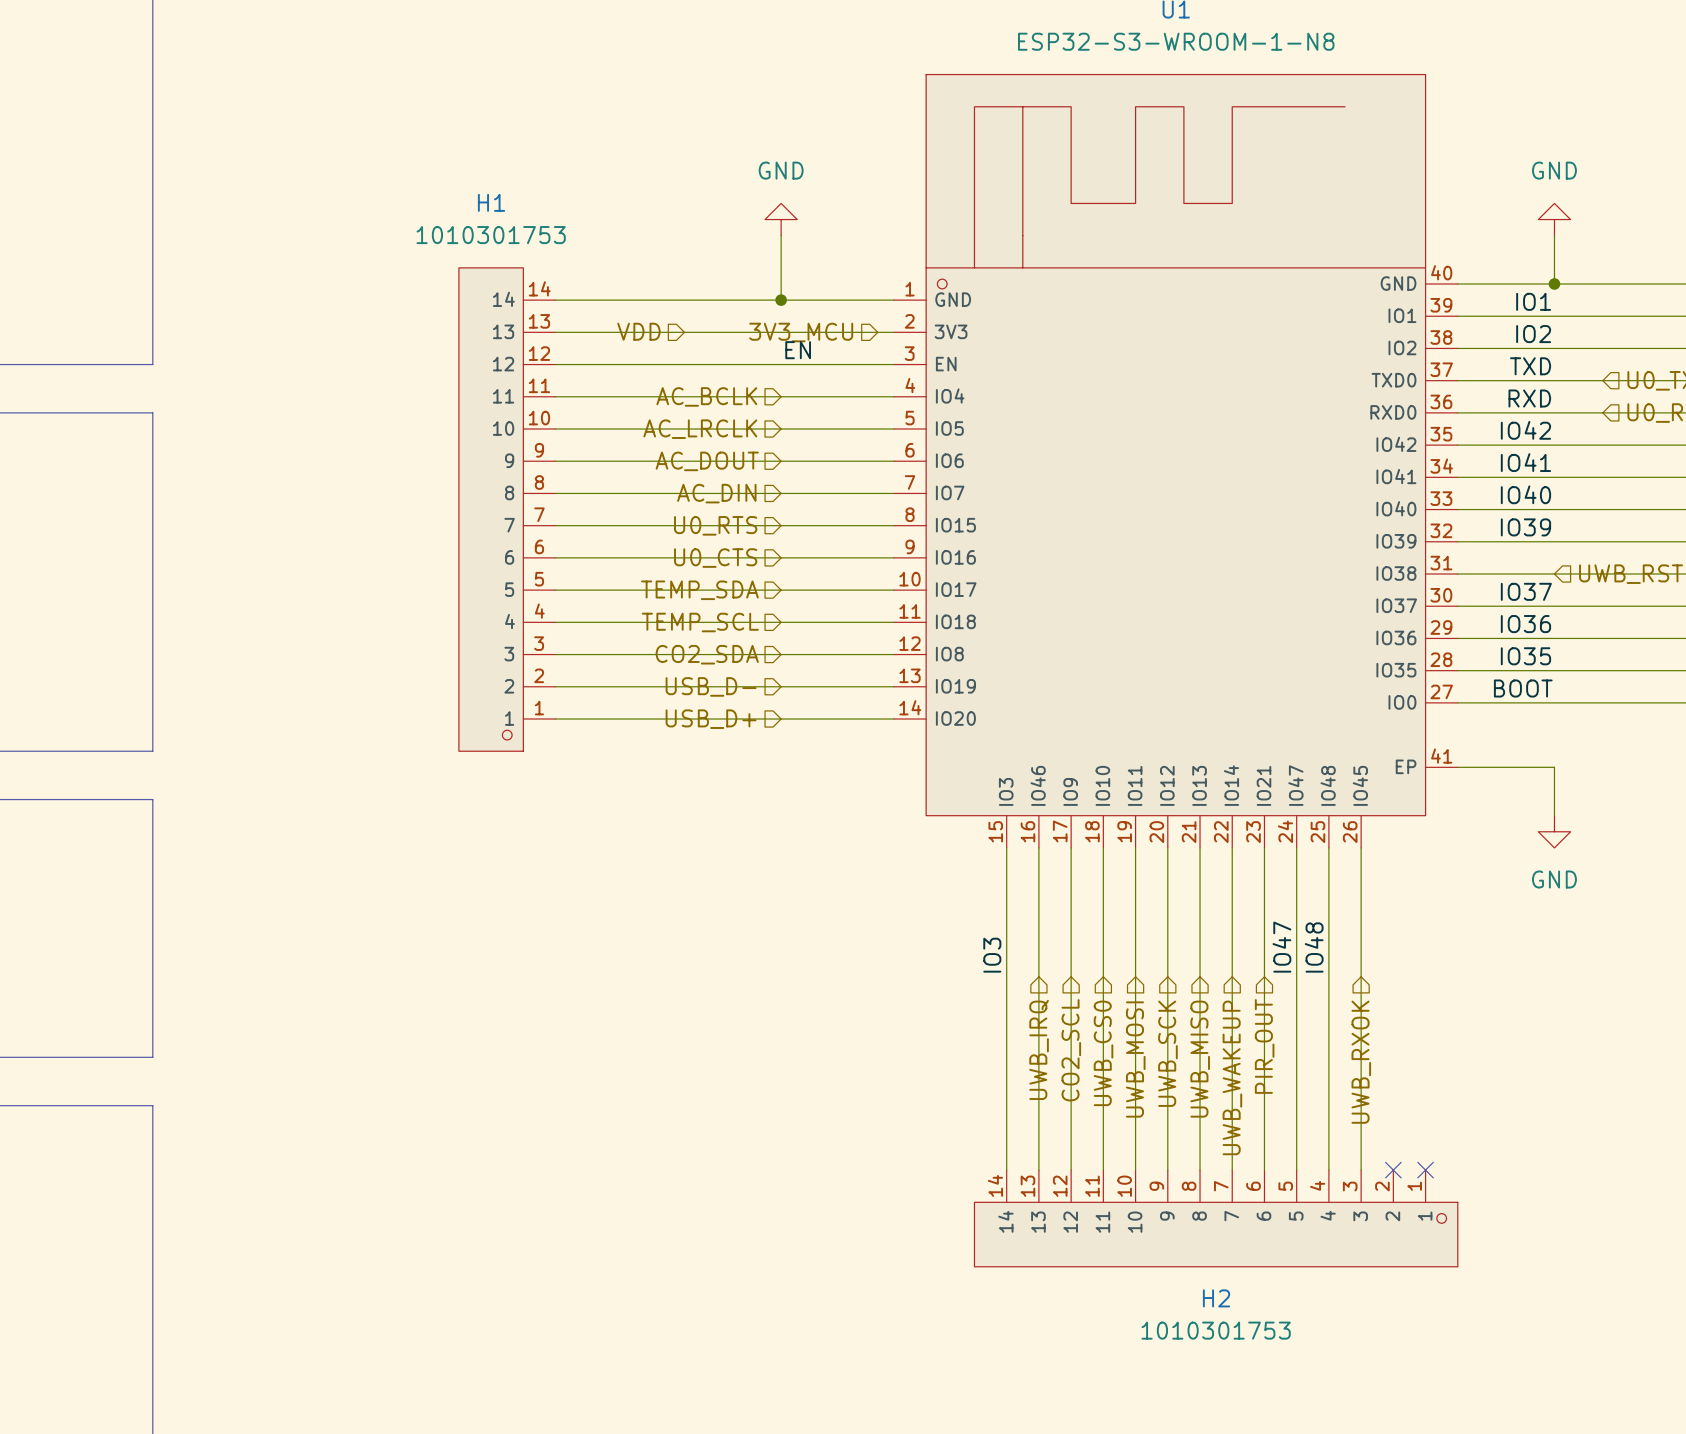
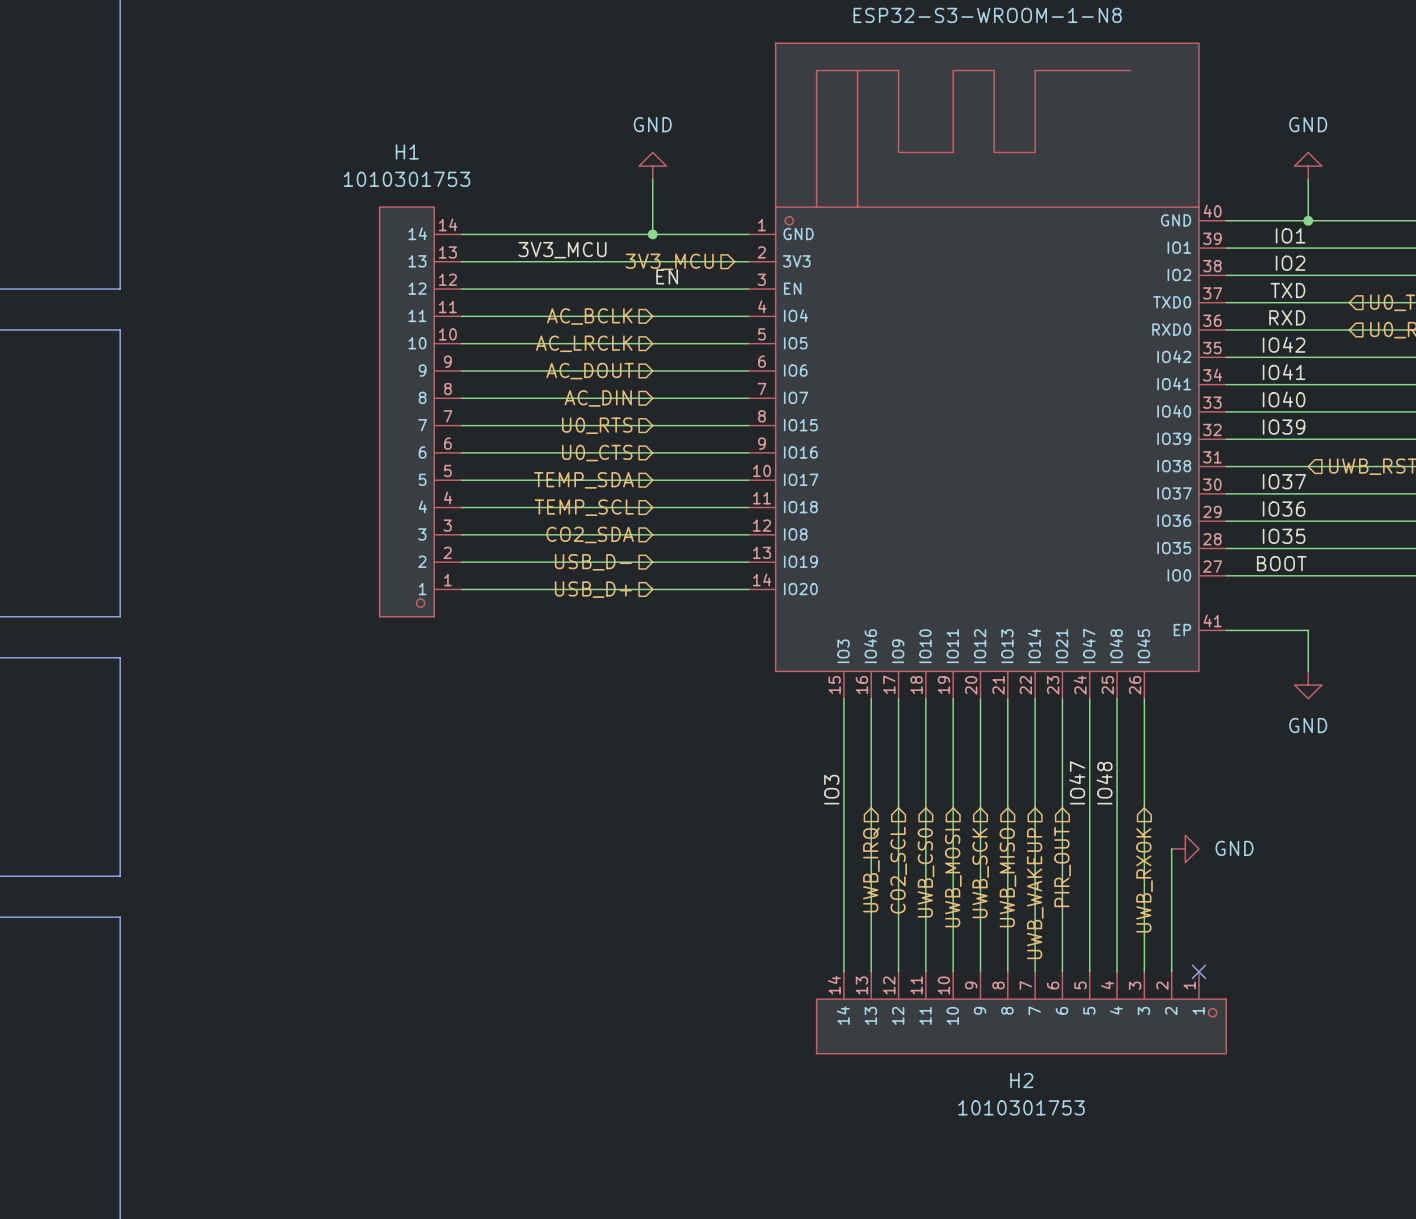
label: none -> 3V3_MCU (562, 250)
hierarchical label: VDD (638, 331) -> none
wire: none -> (1171, 848) (1171, 971)
power symbol: none -> GND (1185, 848)
no-connect mark: (1393, 1170) -> none

